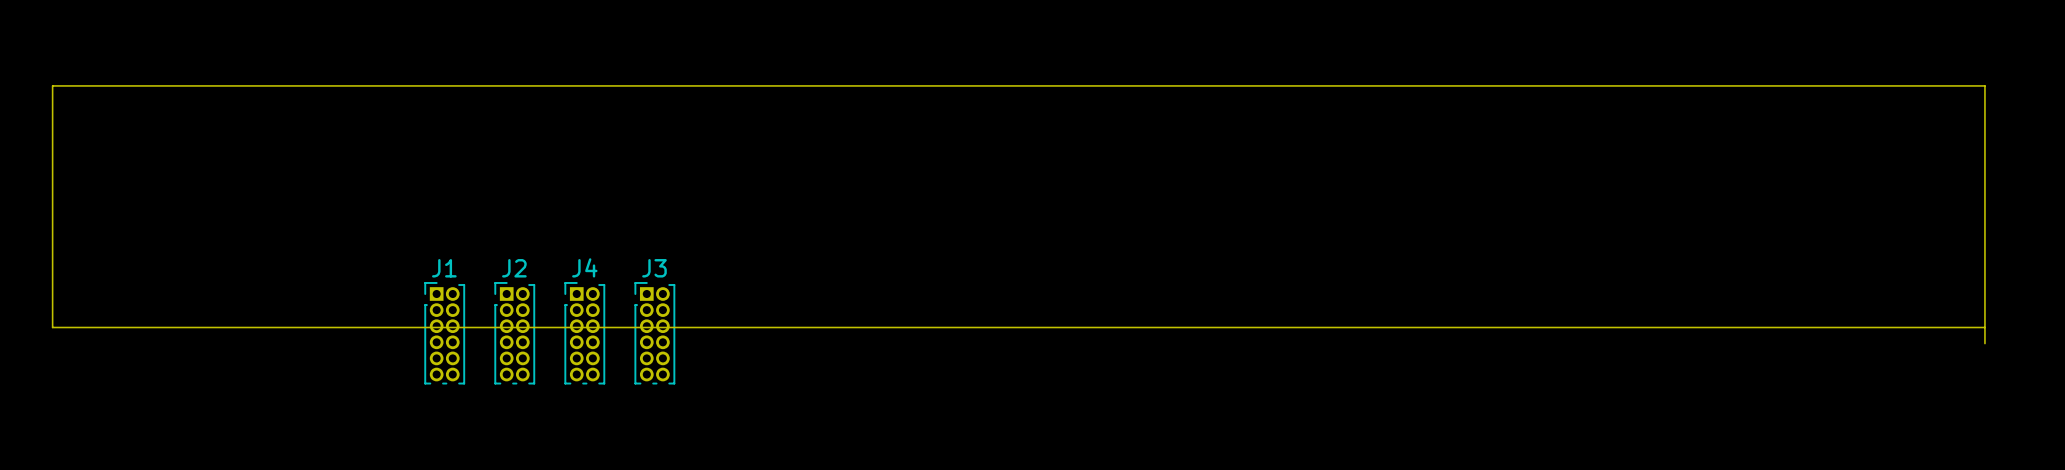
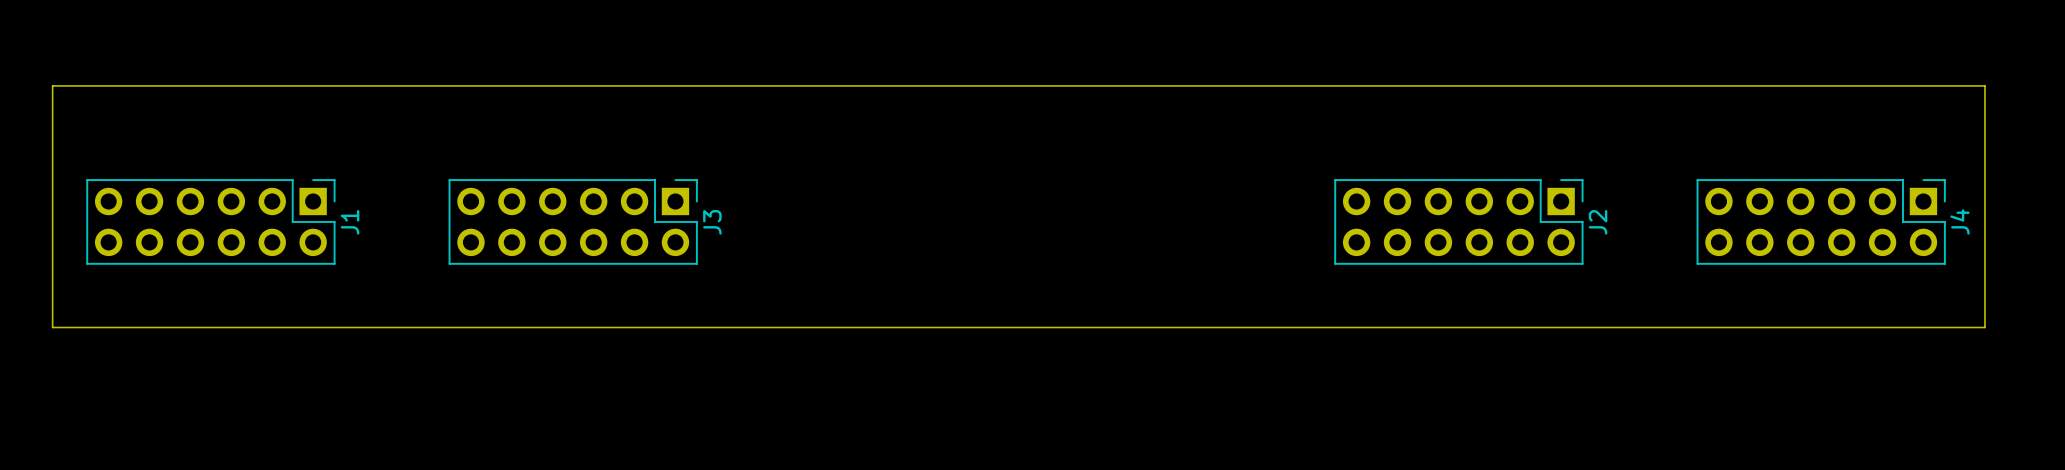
J4 name position: J4 (584, 267) -> J4 (1959, 221)
J1 name position: J1 (444, 268) -> J1 (350, 222)
J2 name position: J2 (514, 268) -> J2 (1598, 222)
J3 name position: J3 (654, 268) -> J3 (712, 222)
J1 footprint: [424, 282, 466, 385] -> [86, 179, 336, 265]
J2 footprint: [494, 282, 536, 385] -> [1334, 179, 1584, 265]
J4 footprint: [564, 282, 606, 385] -> [1696, 179, 1946, 265]
J3 footprint: [634, 282, 676, 385] -> [448, 179, 698, 265]
board edge: (1984, 327) (1984, 343) -> none

